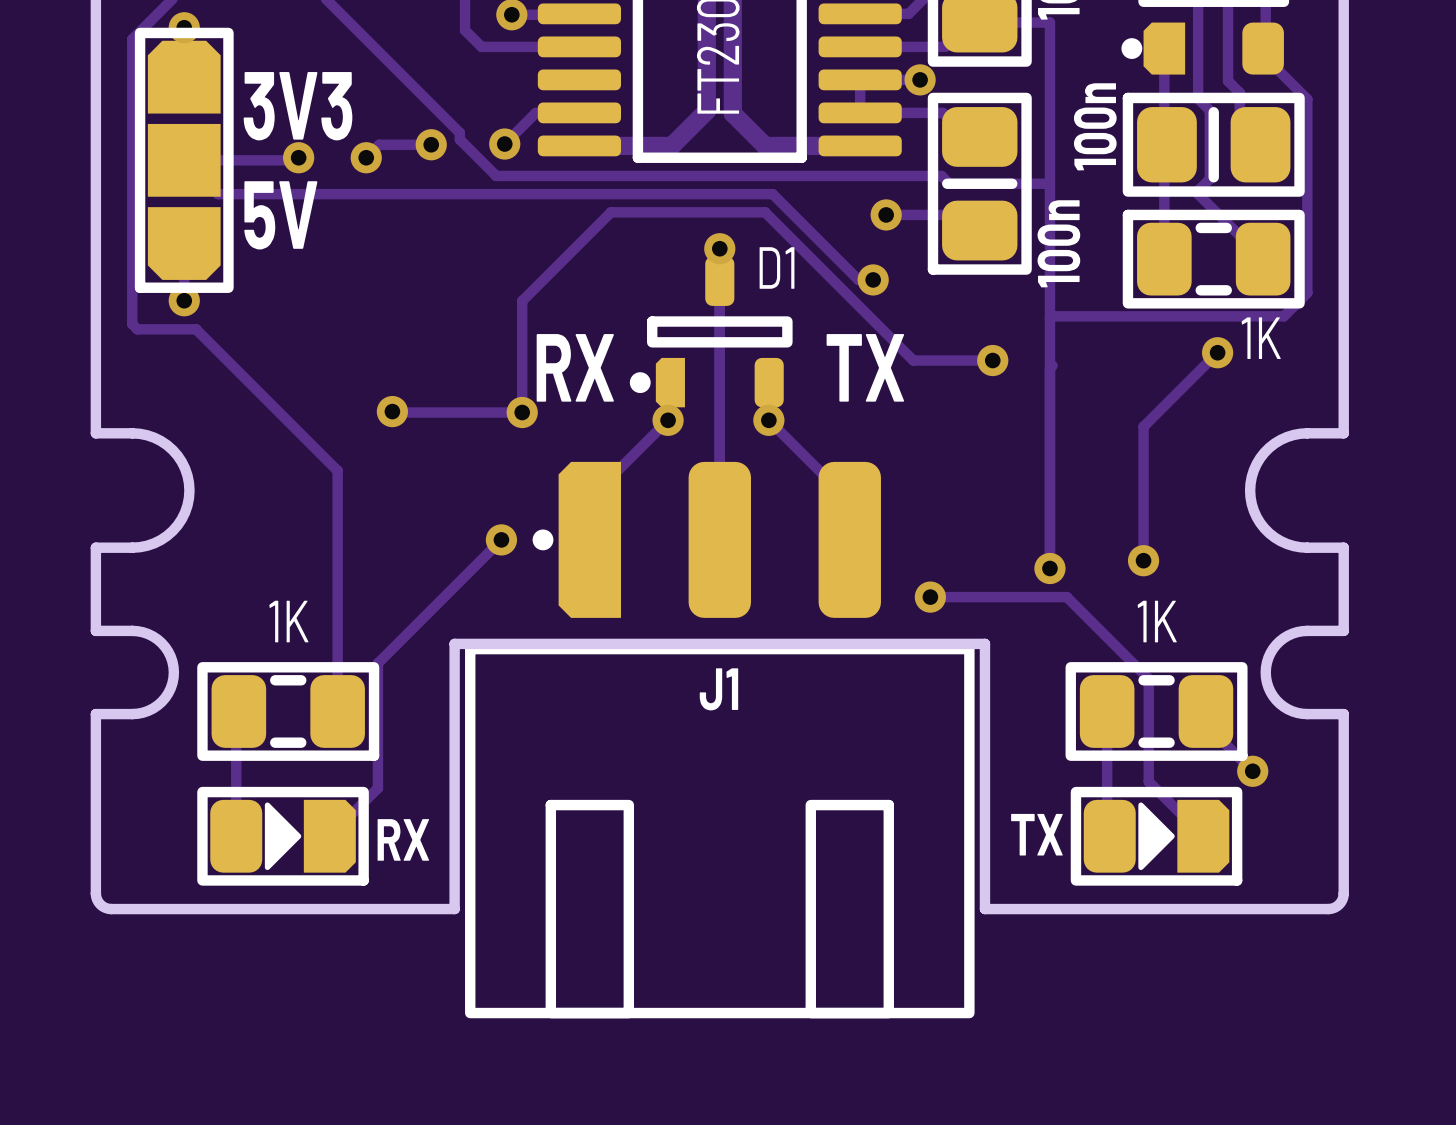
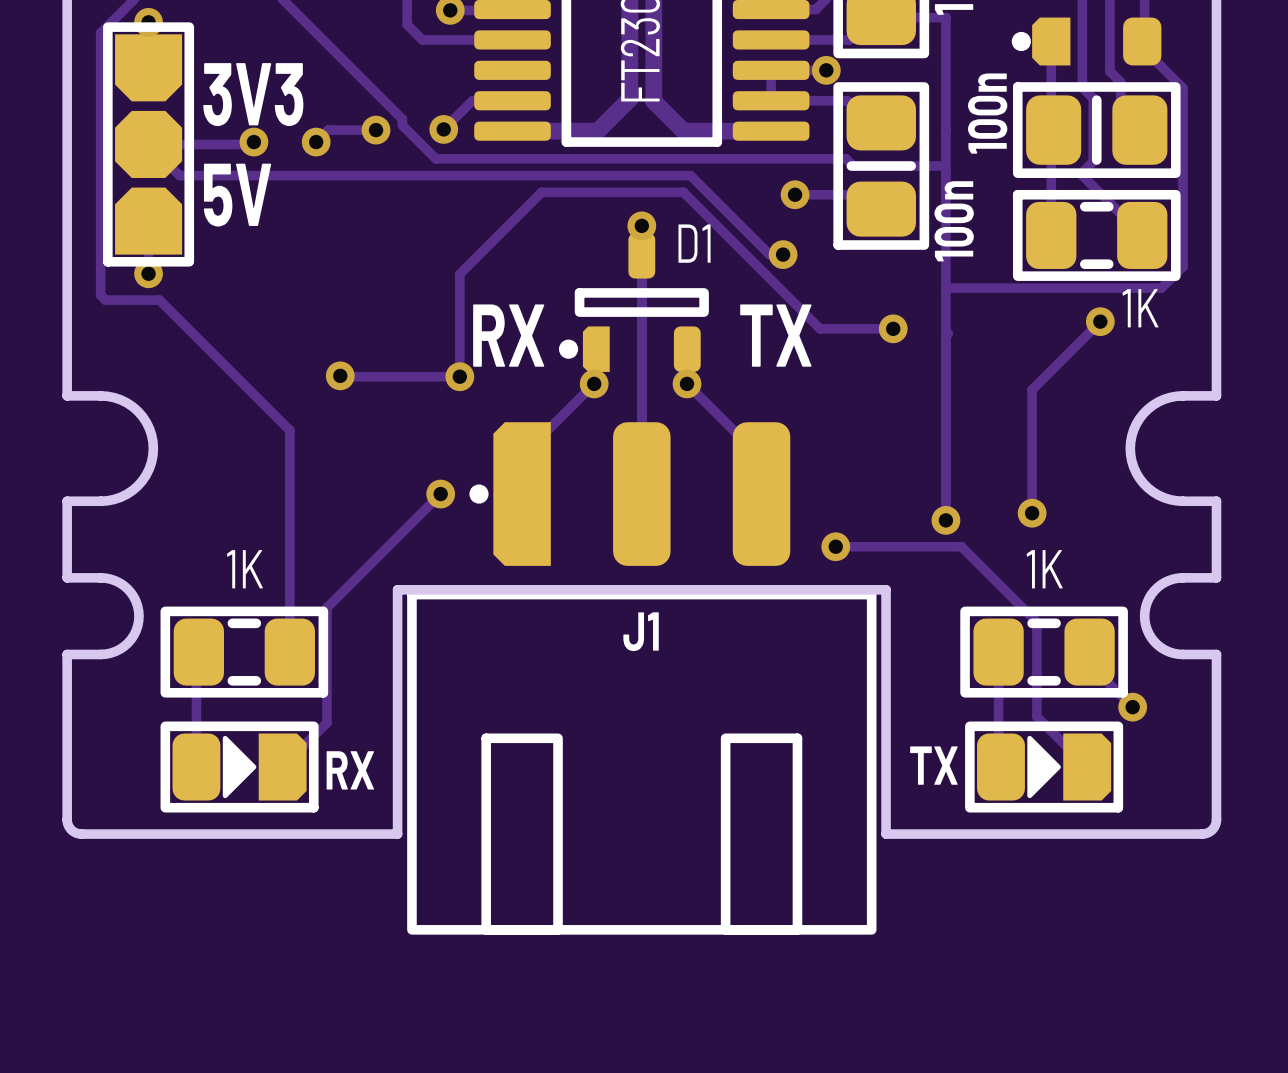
part footprint: [134, 27, 234, 293] -> [103, 22, 195, 267]

